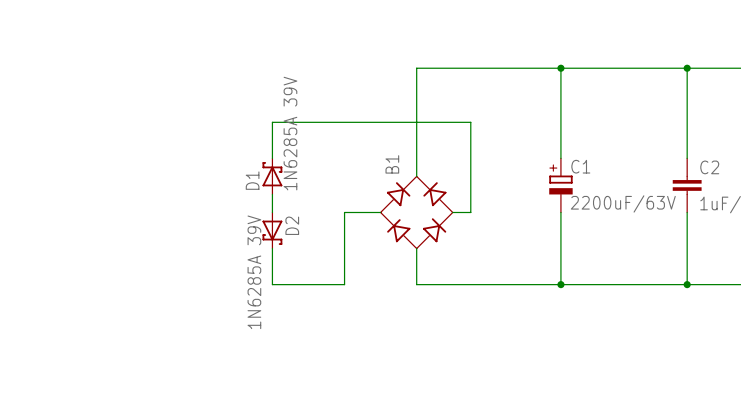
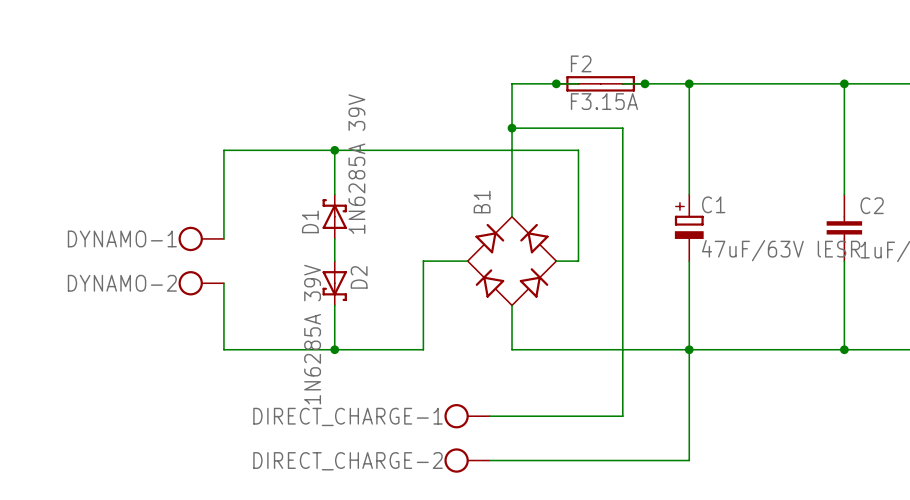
junction: none -> (556, 83)
F2: none -> F3.15A (600, 83)
junction: none -> (644, 83)
wire: none -> (512, 128) (622, 128) (622, 416) (489, 416)
junction: none -> (512, 128)
wire: none -> (334, 150) (223, 150) (223, 238)
junction: none -> (334, 150)
DYNAMO-1: none -> (201, 238)
C1 value: 2200uF/63V (623, 203) -> 47uF/63V lESR (781, 250)
DYNAMO-2: none -> (201, 283)
wire: none -> (223, 283) (223, 349) (334, 349)
junction: none -> (334, 349)
wire: none -> (689, 349) (689, 460) (489, 460)
DIRECT_CHARGE-1: none -> (467, 416)
DIRECT_CHARGE-2: none -> (467, 460)

